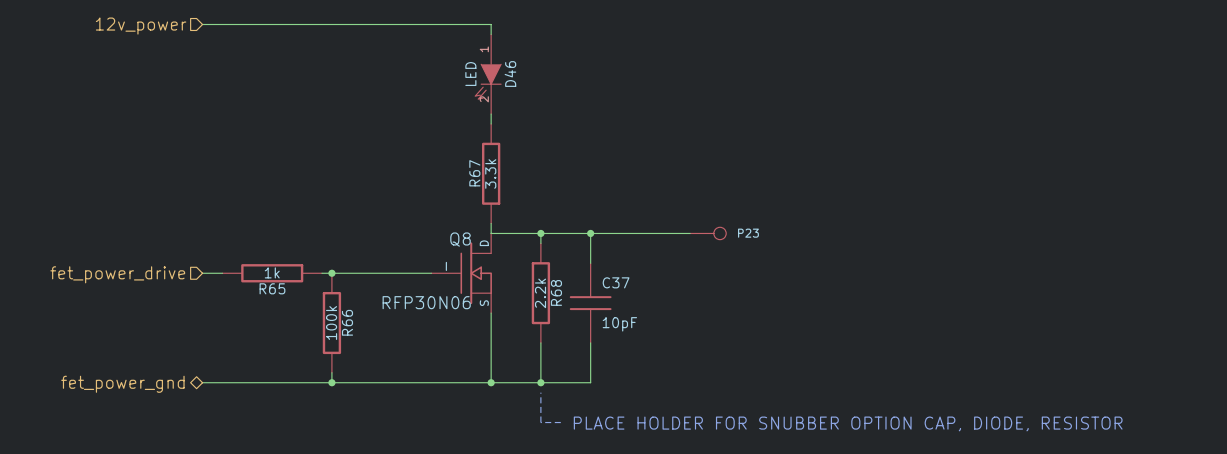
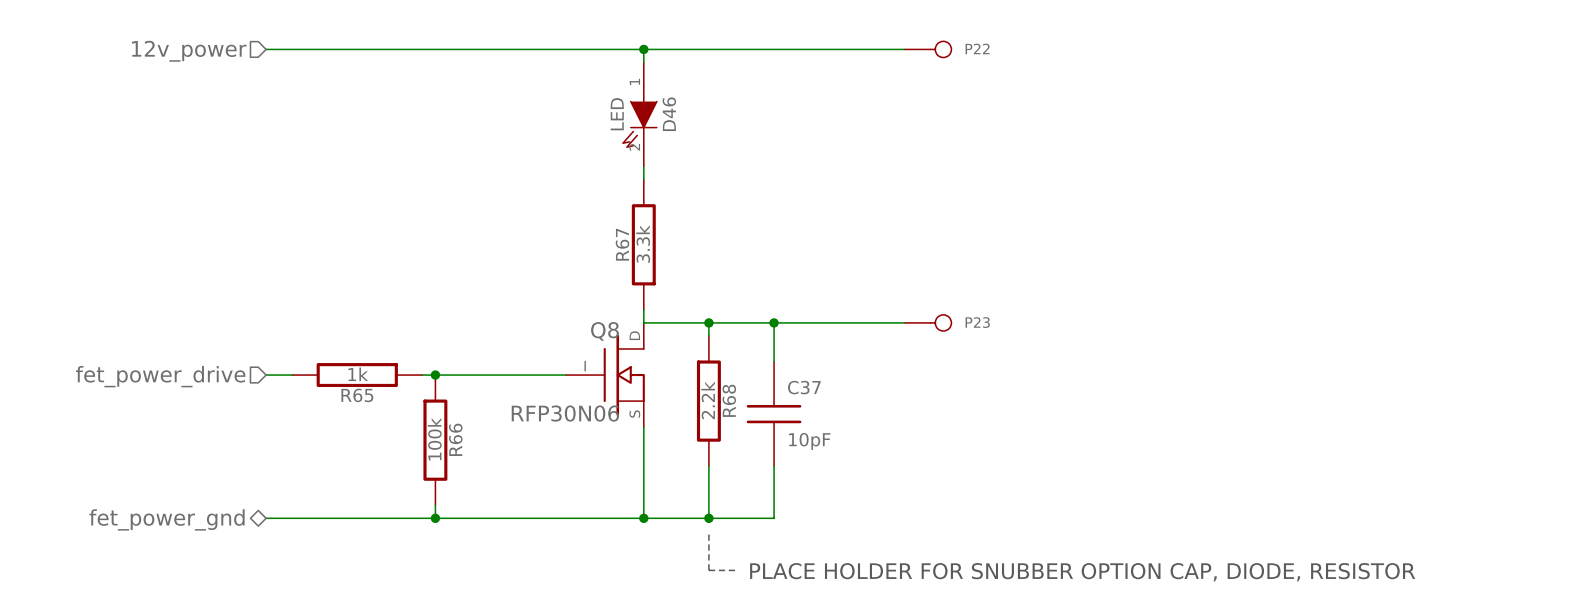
wire: none -> (643, 49) (904, 49)
junction: none -> (643, 49)
P22: none -> (927, 49)

